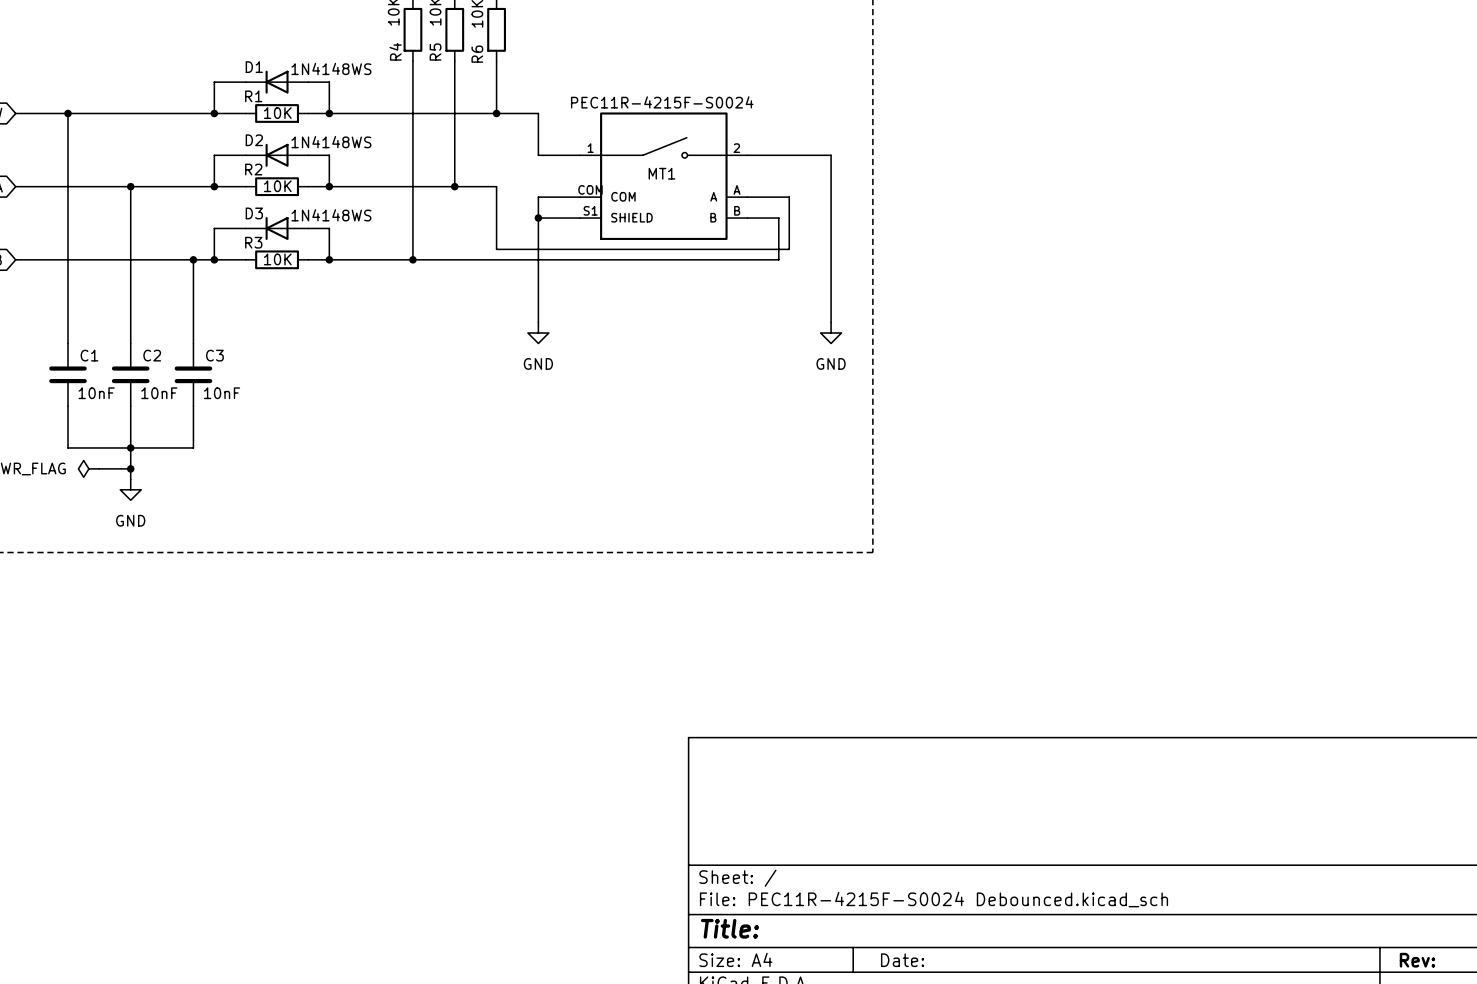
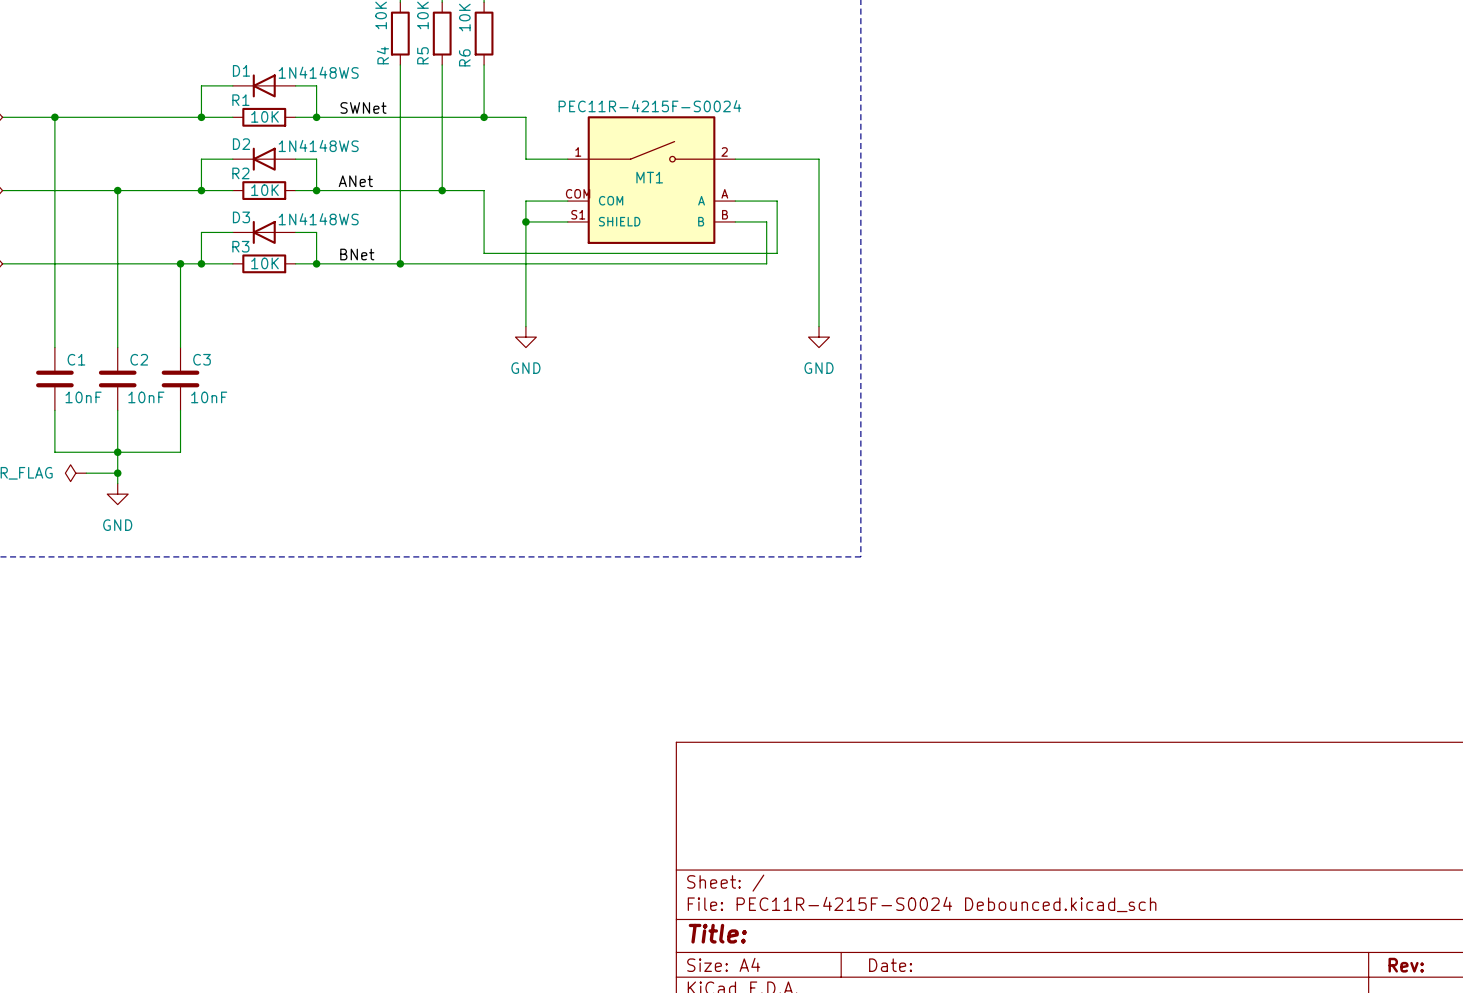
label: none -> SWNet (363, 107)
label: none -> ANet (355, 181)
label: none -> BNet (357, 254)

